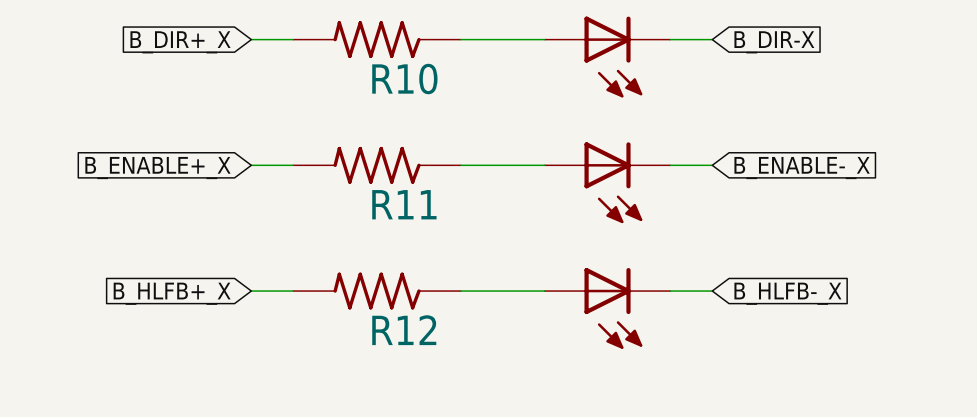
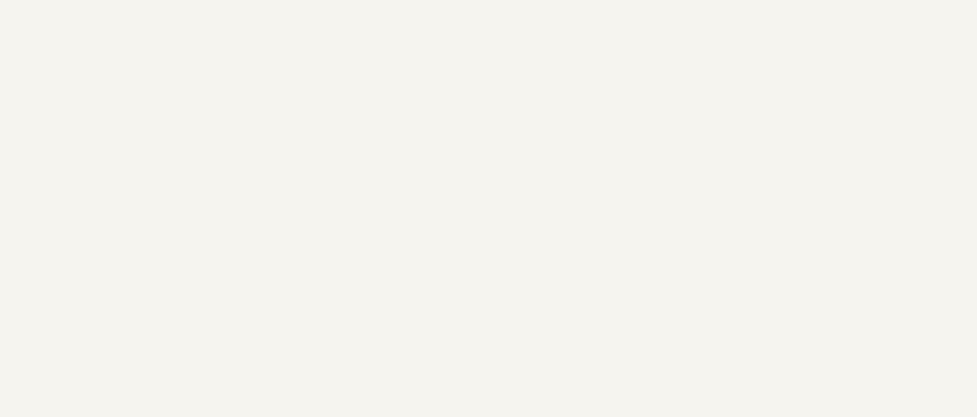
wire: (251, 39) (293, 39) -> none
R10: (377, 39) -> none
wire: (460, 39) (544, 39) -> none
wire: (670, 39) (712, 39) -> none
global label: B_DIR+_X (180, 42) -> none
global label: B_DIR-X (774, 42) -> none
part: (607, 57) -> none
wire: (251, 165) (293, 165) -> none
R11: (377, 165) -> none
wire: (460, 165) (544, 165) -> none
wire: (670, 165) (712, 165) -> none
global label: B_ENABLE+_X (157, 168) -> none
global label: B_ENABLE-_X (802, 168) -> none
part: (607, 182) -> none
wire: (251, 291) (293, 291) -> none
R12: (377, 291) -> none
wire: (460, 291) (544, 291) -> none
wire: (670, 291) (712, 291) -> none
global label: B_HLFB+_X (172, 293) -> none
global label: B_HLFB-_X (787, 293) -> none
part: (607, 308) -> none

